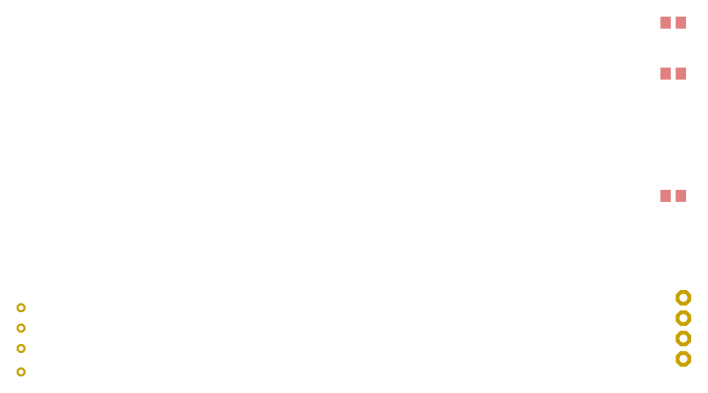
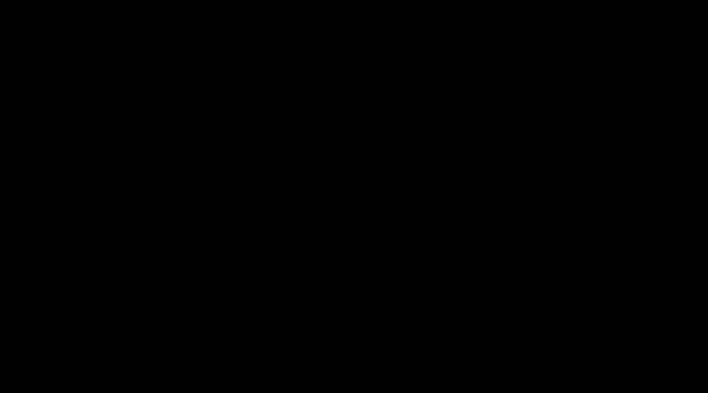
part: (673, 22) -> none
part: (673, 73) -> none
part: (673, 195) -> none
part: (683, 328) -> none
part: (21, 339) -> none

